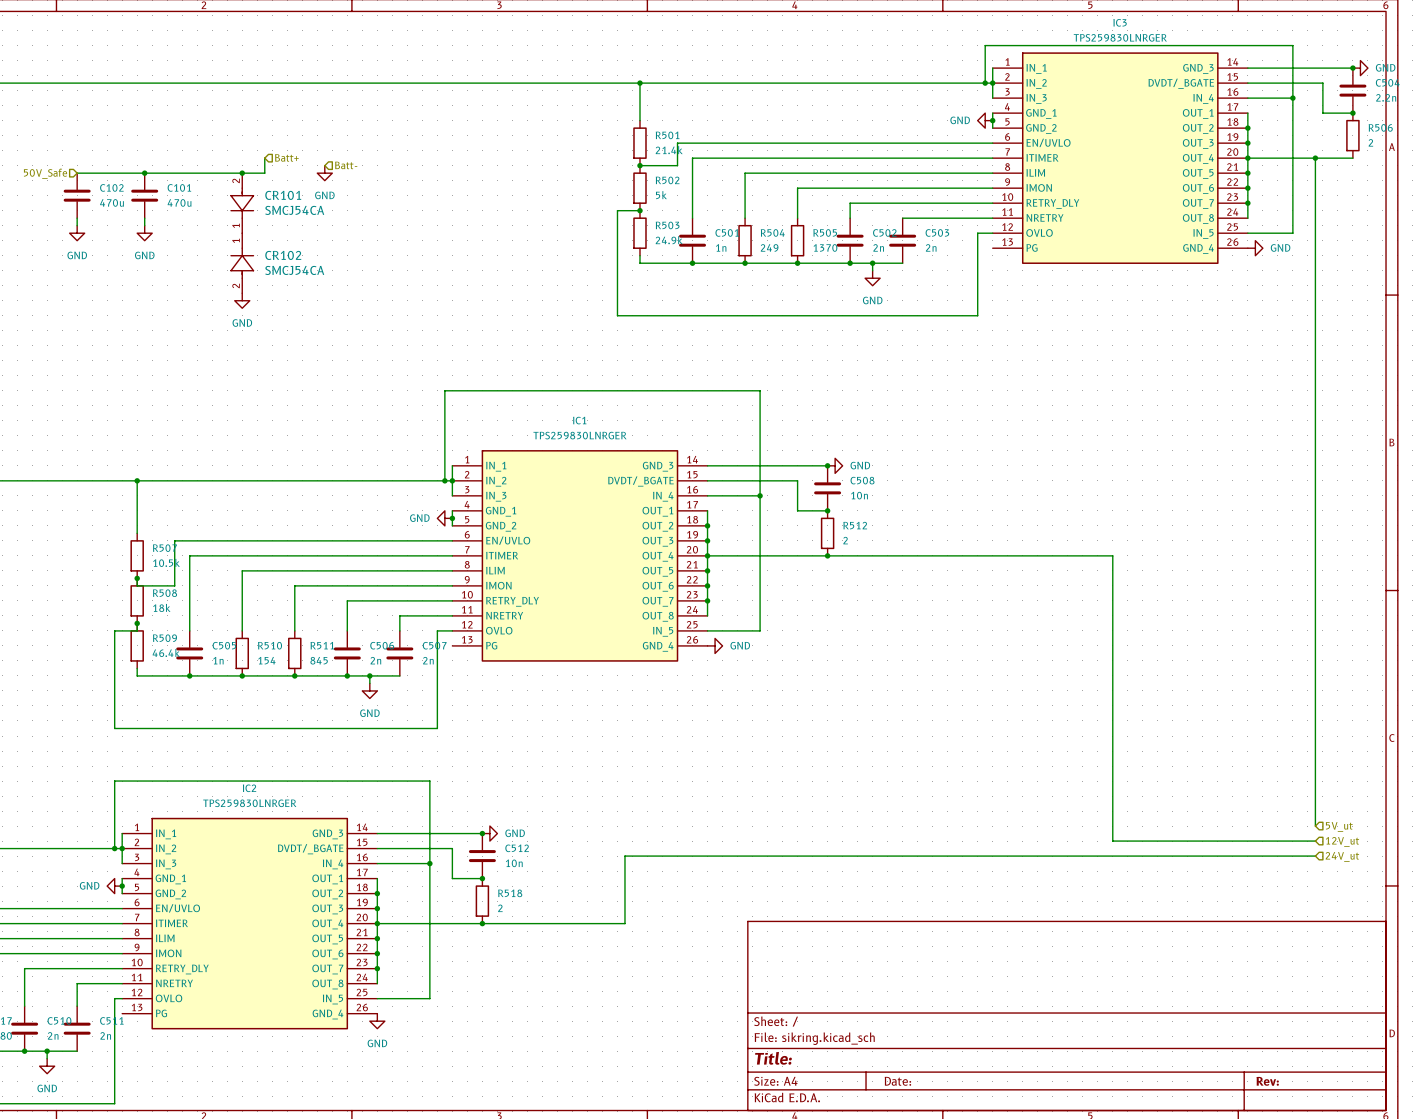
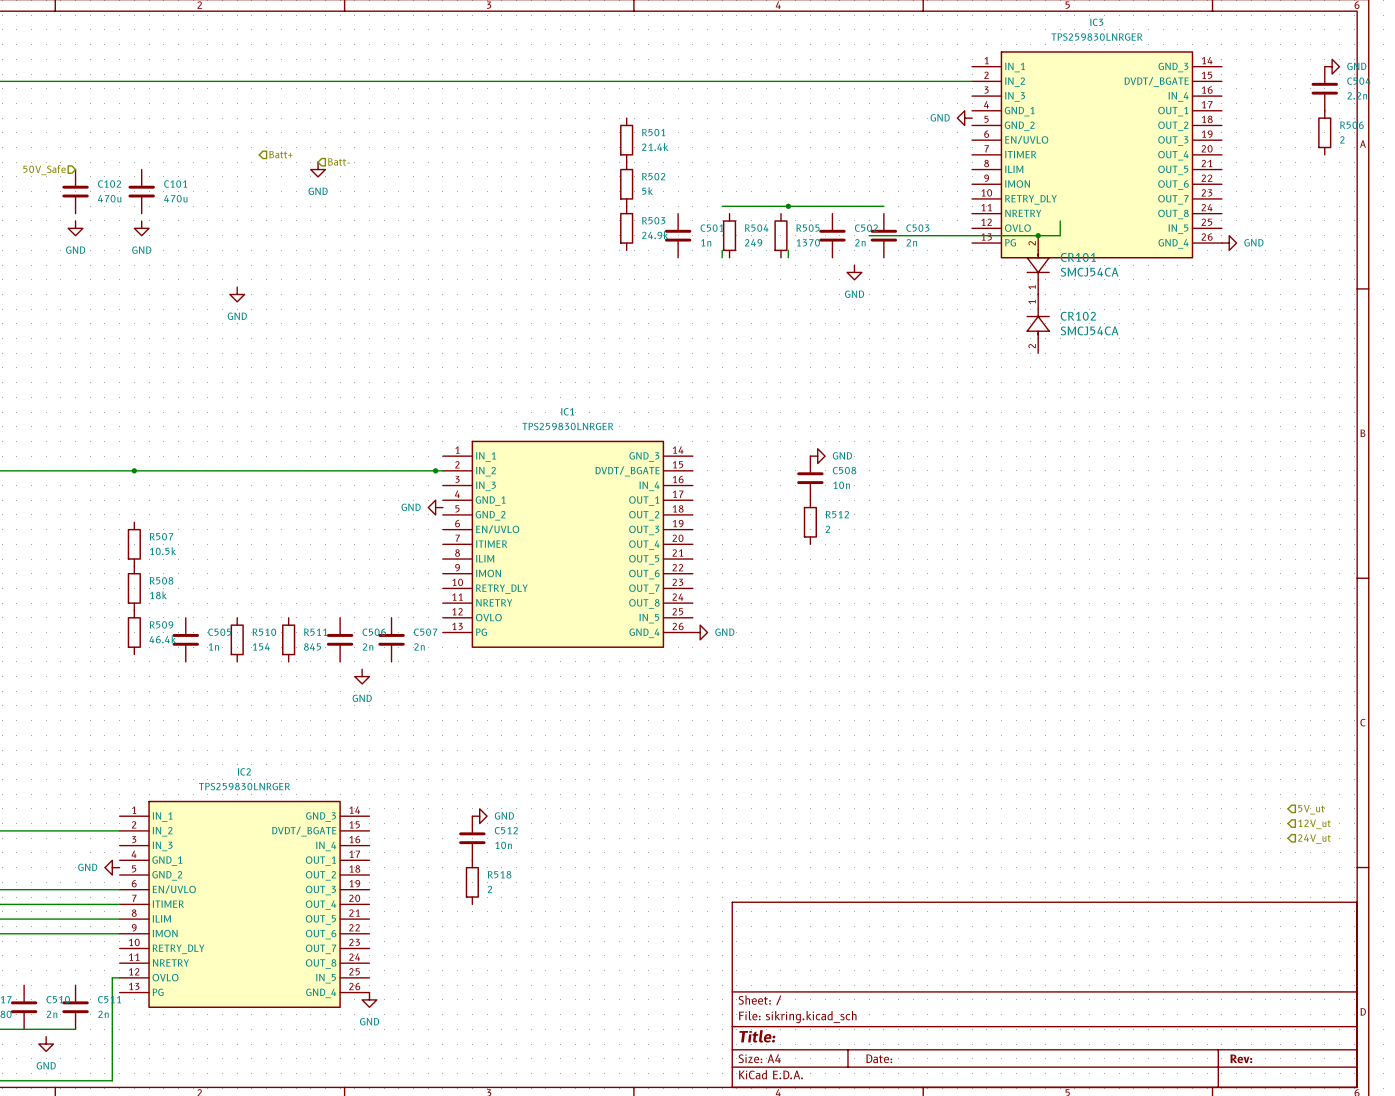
wire: (992, 68) (992, 98) -> none
wire: (1247, 68) (1352, 68) -> none
junction: (1352, 68) -> none
wire: (639, 83) (639, 120) -> none
junction: (639, 83) -> none
wire: (985, 83) (985, 45) (1292, 45) (1292, 233) (1247, 233) -> none
junction: (985, 83) -> none
junction: (992, 83) -> none
wire: (1247, 83) (1322, 83) (1322, 113) (1352, 113) -> none
wire: (1247, 98) (1292, 98) -> none
junction: (1292, 98) -> none
wire: (992, 113) (992, 128) -> none
wire: (1247, 113) (1247, 218) -> none
junction: (1352, 113) -> none
junction: (992, 120) -> none
junction: (1247, 128) -> none
wire: (992, 143) (677, 143) (677, 165) (639, 165) -> none
junction: (1247, 143) -> none
wire: (264, 158) (264, 173) (77, 173) -> none
wire: (992, 158) (692, 158) (692, 218) -> none
wire: (1247, 158) (1352, 158) -> none
junction: (1247, 158) -> none
wire: (1315, 158) (1315, 826) -> none
junction: (1315, 158) -> none
junction: (639, 165) -> none
junction: (144, 173) -> none
junction: (242, 173) -> none
wire: (992, 173) (745, 173) (745, 218) -> none
junction: (1247, 173) -> none
wire: (992, 188) (797, 188) (797, 218) -> none
junction: (1247, 188) -> none
CR101 position: (242, 203) -> (1038, 265)
wire: (992, 203) (850, 203) (850, 218) -> none
junction: (1247, 203) -> none
wire: (639, 210) (617, 210) (617, 315) (977, 315) (977, 233) (992, 233) -> none
junction: (639, 210) -> none
wire: none -> (722, 206) (883, 206)
junction: none -> (788, 206)
wire: (77, 218) (77, 225) -> none
wire: (144, 218) (144, 225) -> none
wire: (902, 218) (992, 218) -> none
wire: none -> (1060, 220) (1060, 235) (869, 235)
junction: none -> (1038, 235)
wire: (639, 255) (639, 263) (902, 263) -> none
wire: none -> (722, 250) (722, 257)
CR102 position: (242, 263) -> (1038, 323)
junction: (692, 263) -> none
junction: (745, 263) -> none
junction: (797, 263) -> none
junction: (850, 263) -> none
wire: (872, 263) (872, 270) -> (788, 250) (788, 257)
junction: (872, 263) -> none
wire: (452, 465) (452, 495) -> none
wire: (707, 465) (827, 465) -> none
junction: (827, 465) -> none
wire: (137, 480) (137, 533) -> none
wire: (444, 480) (444, 390) (760, 390) (760, 630) (707, 630) -> none
junction: (452, 480) -> none
wire: (707, 480) (797, 480) (797, 510) (827, 510) -> none
wire: (707, 495) (760, 495) -> none
junction: (760, 495) -> none
wire: (452, 510) (452, 525) -> none
wire: (707, 510) (707, 615) -> none
junction: (827, 510) -> none
junction: (452, 518) -> none
junction: (707, 525) -> none
wire: (452, 540) (174, 540) (174, 585) (137, 585) (137, 578) -> none
junction: (707, 540) -> none
wire: (452, 555) (189, 555) (189, 630) -> none
wire: (707, 555) (1112, 555) (1112, 841) (1315, 841) -> none
junction: (707, 555) -> none
junction: (827, 555) -> none
wire: (452, 570) (242, 570) (242, 630) -> none
junction: (707, 570) -> none
junction: (137, 578) -> none
wire: (452, 585) (294, 585) (294, 630) -> none
junction: (707, 585) -> none
wire: (452, 600) (347, 600) (347, 630) -> none
junction: (707, 600) -> none
wire: (452, 615) (399, 615) (399, 630) -> none
wire: (137, 623) (137, 630) (114, 630) (114, 728) (437, 728) (437, 630) (452, 630) -> none
junction: (137, 623) -> none
wire: (137, 668) (137, 675) (399, 675) -> none
junction: (189, 675) -> none
junction: (242, 675) -> none
junction: (294, 675) -> none
junction: (347, 675) -> none
wire: (369, 675) (369, 683) -> none
junction: (369, 675) -> none
wire: (122, 833) (122, 863) -> none
wire: (377, 833) (482, 833) -> none
junction: (482, 833) -> none
wire: (114, 848) (114, 781) (429, 781) (429, 998) (377, 998) -> none
junction: (114, 848) -> none
junction: (122, 848) -> none
wire: (377, 848) (452, 848) (452, 878) (482, 878) -> none
wire: (1315, 856) (624, 856) (624, 923) (377, 923) -> none
wire: (377, 863) (429, 863) -> none
junction: (429, 863) -> none
wire: (122, 878) (122, 893) -> none
wire: (377, 878) (377, 983) -> none
junction: (482, 878) -> none
junction: (122, 886) -> none
junction: (377, 893) -> none
junction: (377, 908) -> none
junction: (377, 923) -> none
junction: (482, 923) -> none
junction: (377, 938) -> none
junction: (377, 953) -> none
wire: (122, 968) (24, 968) (24, 1006) -> none
junction: (377, 968) -> none
wire: (122, 983) (77, 983) (77, 1006) -> none
junction: (24, 1051) -> none
wire: (47, 1051) (47, 1058) -> none
junction: (47, 1051) -> none

